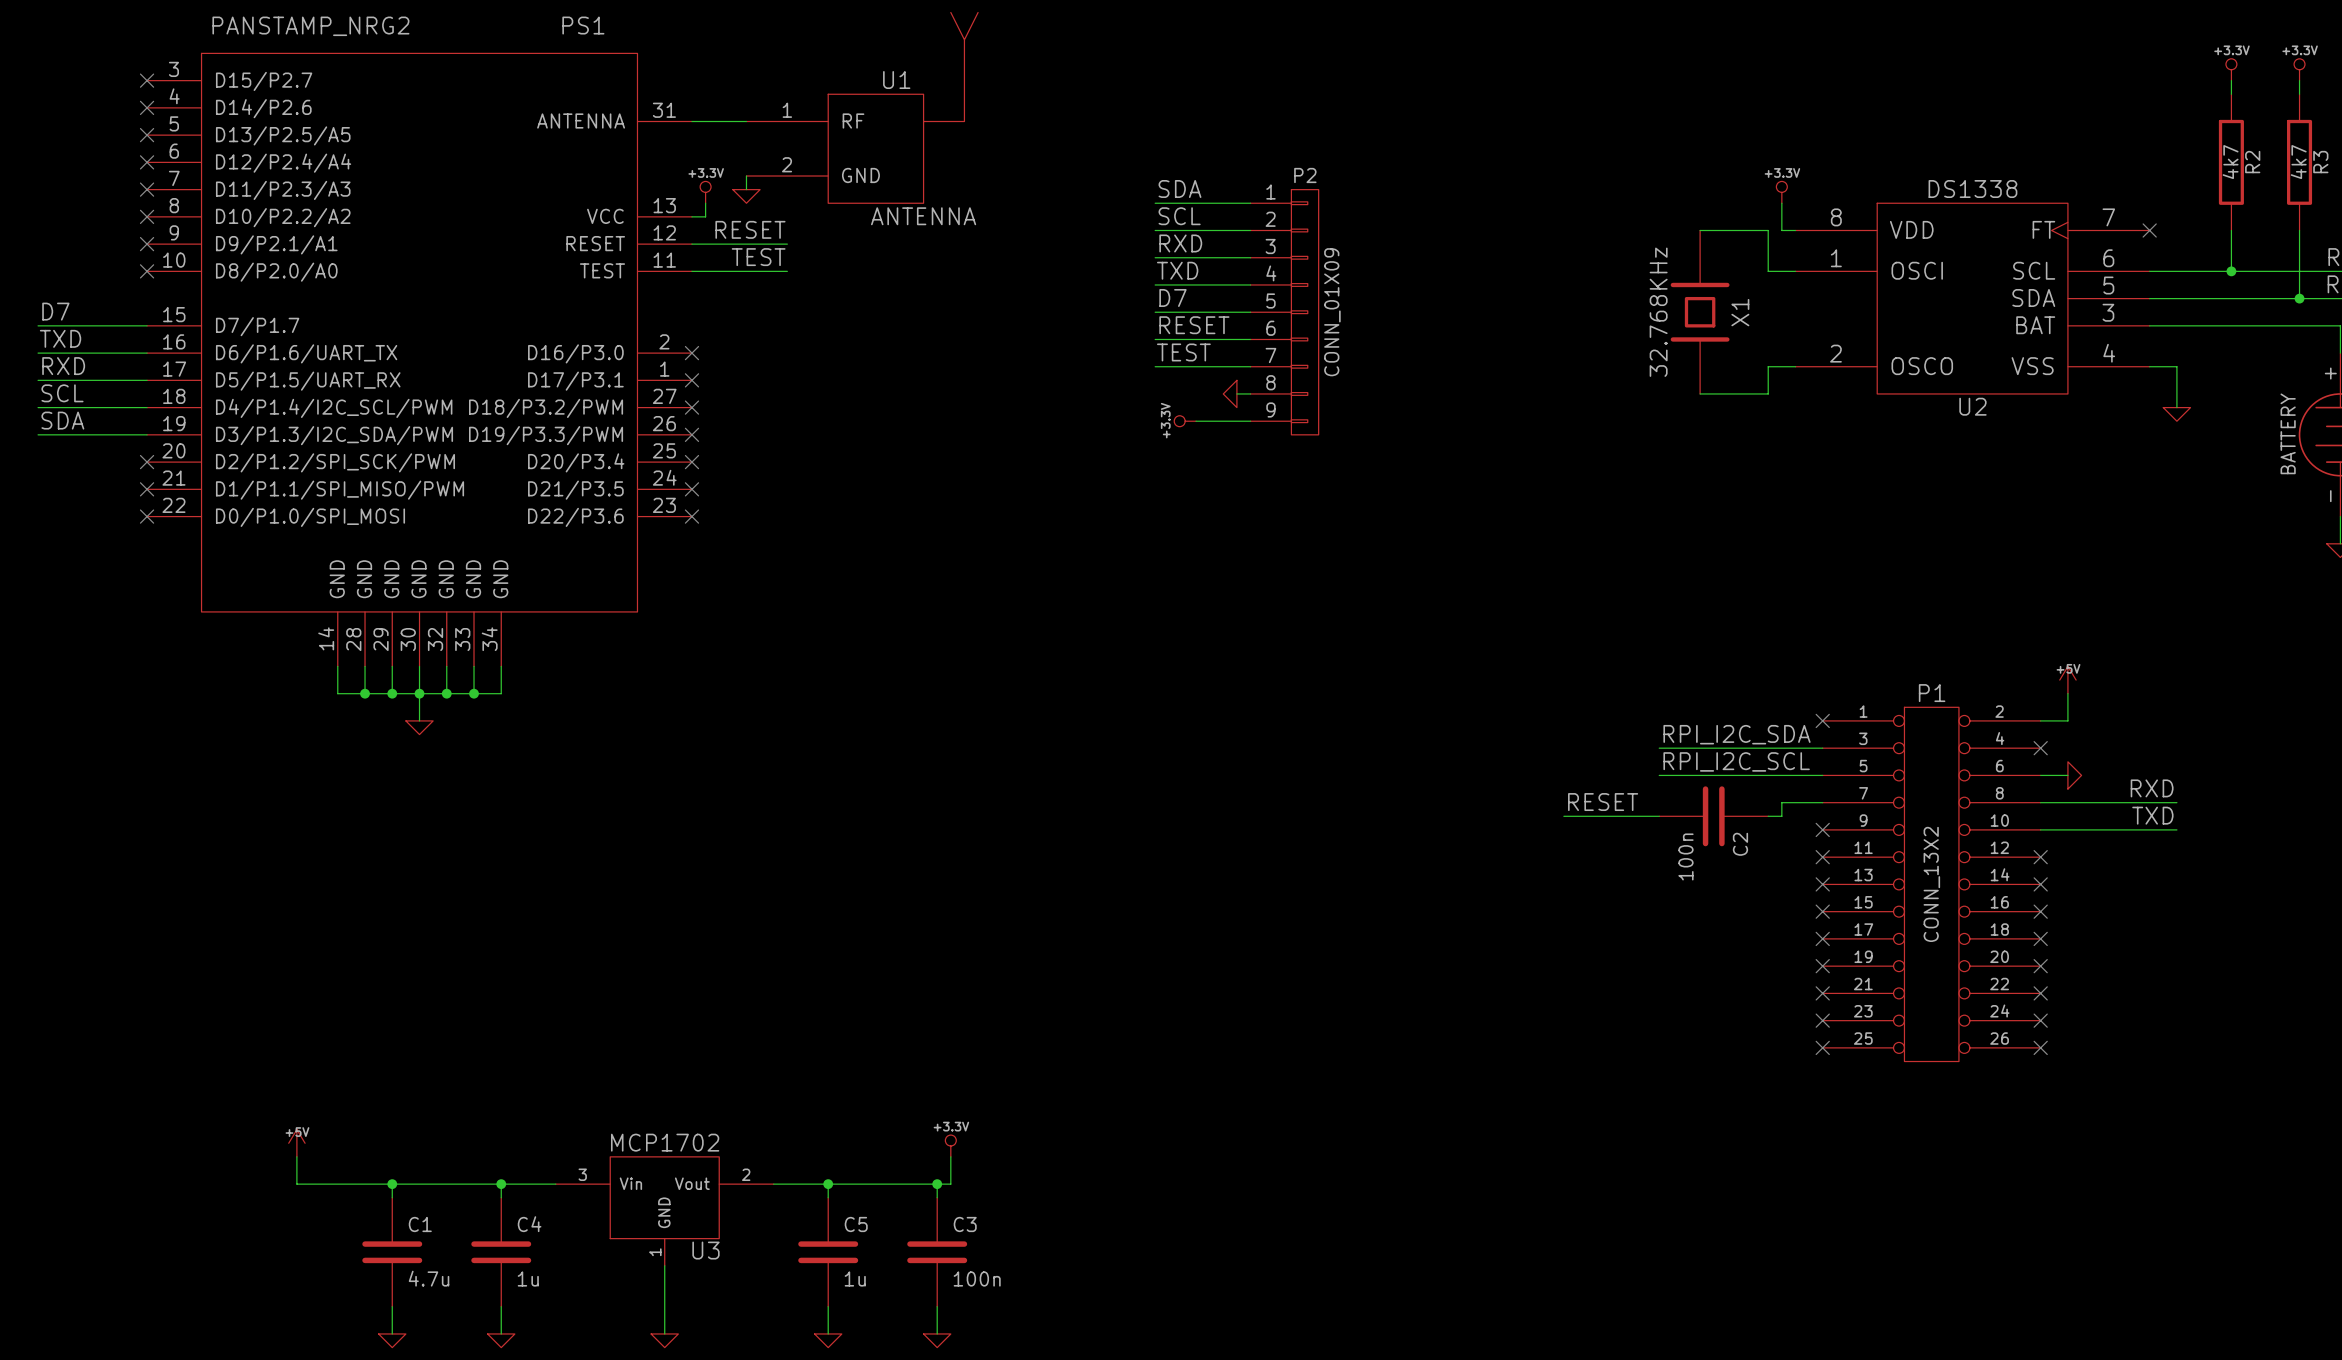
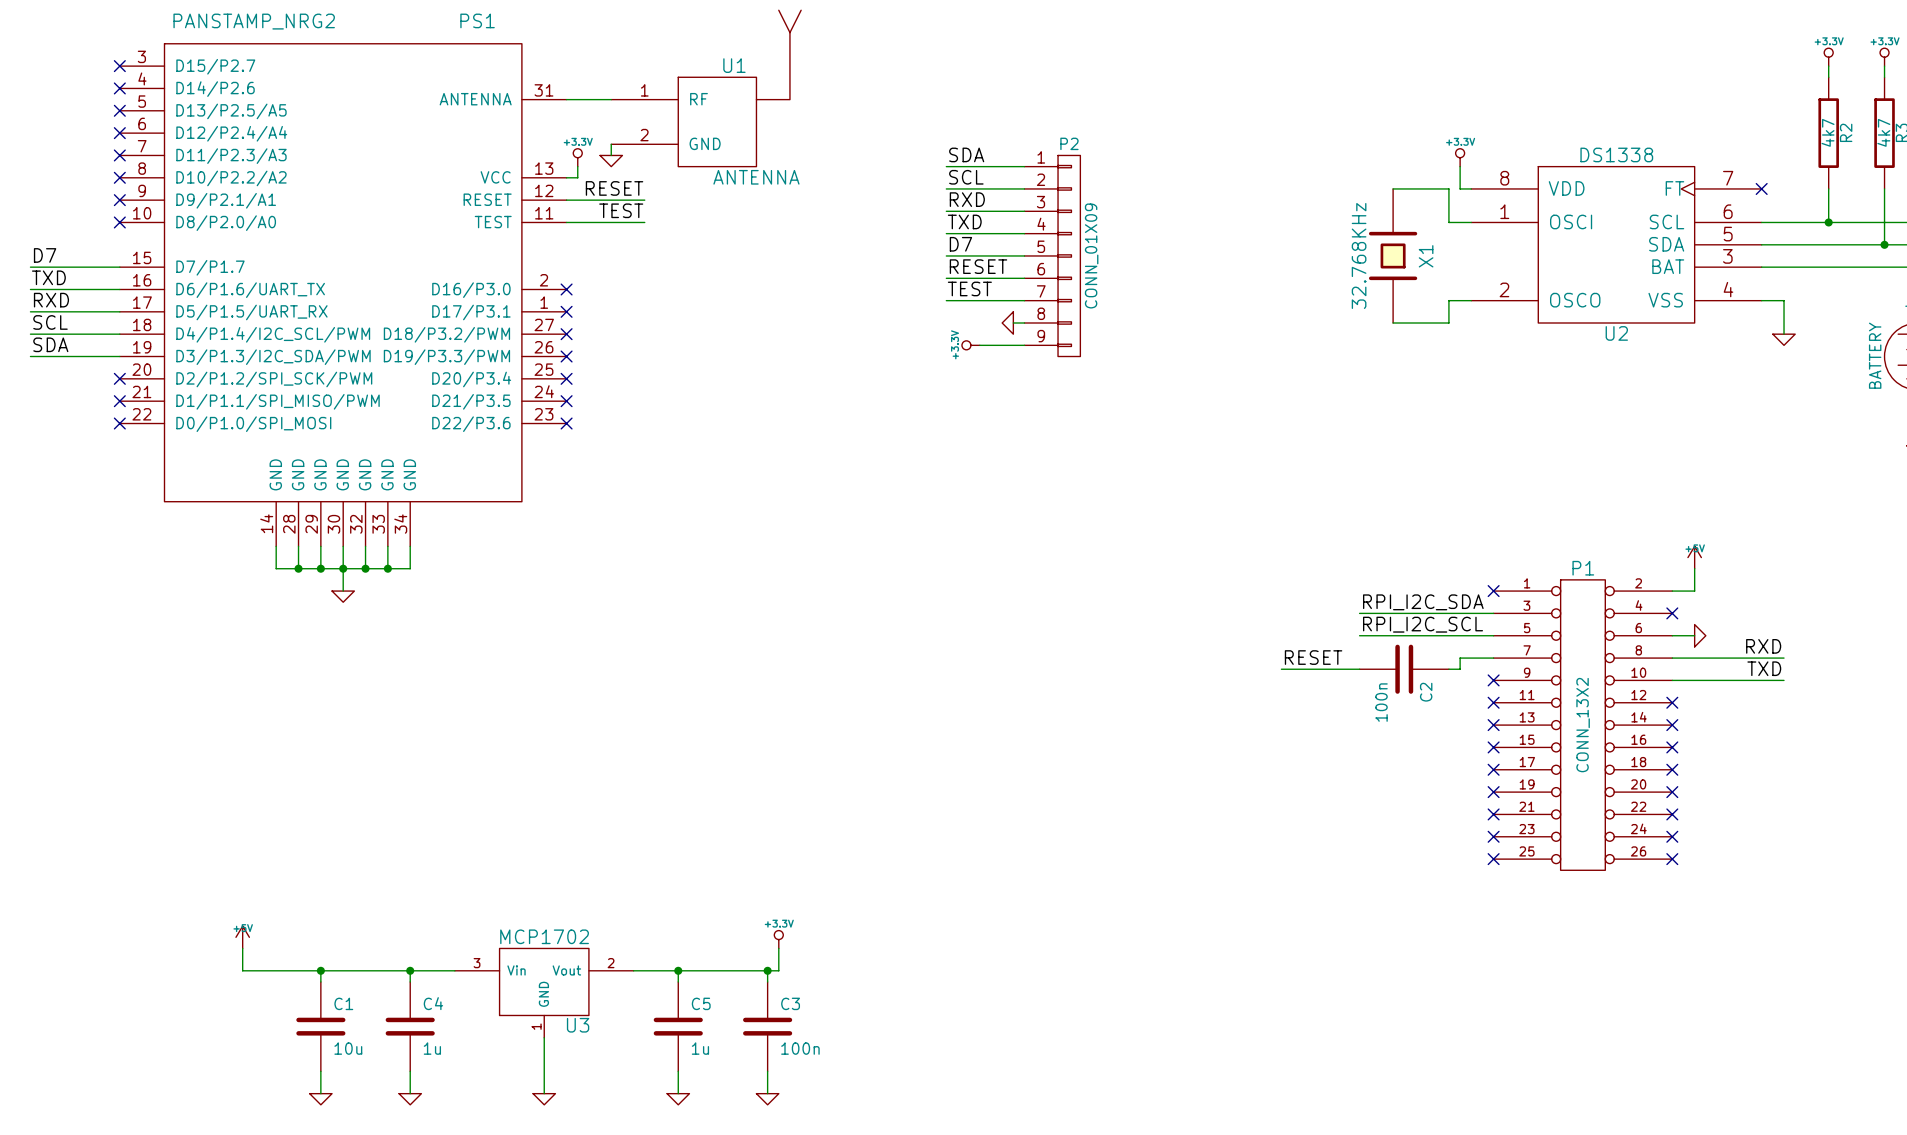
C1 value: 4.7u (429, 1278) -> 10u (348, 1048)

